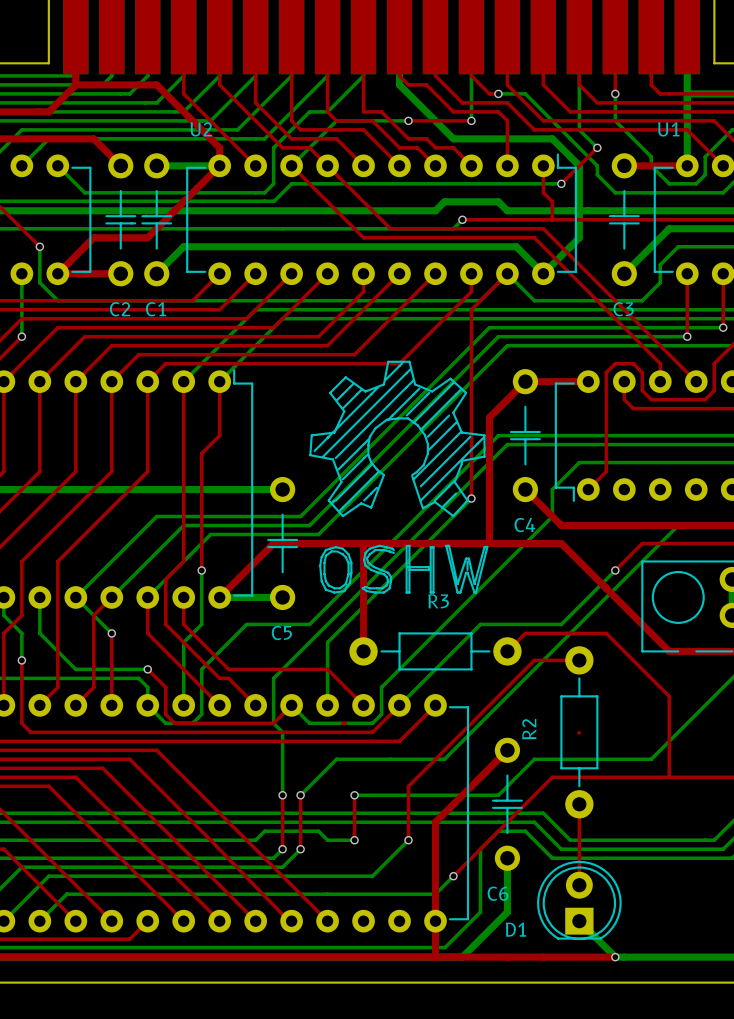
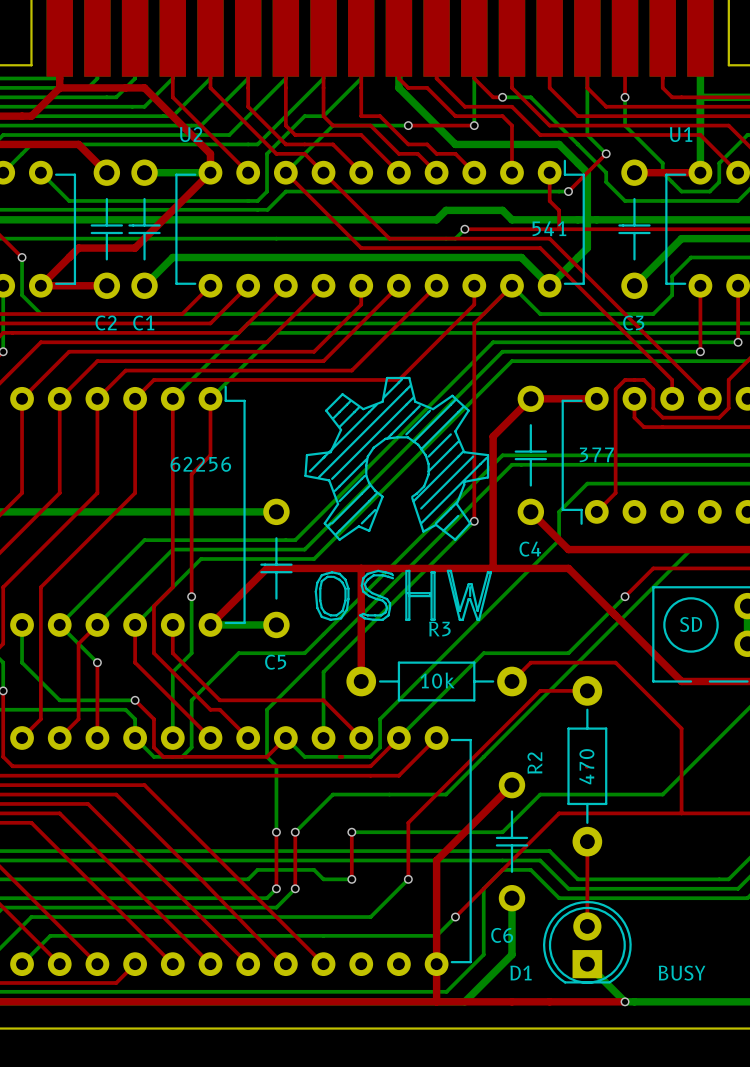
U2 value: none -> 541 (549, 228)
part value: none -> 377 (596, 454)
part value: none -> 62256 (200, 464)
part value: none -> SD (691, 624)
R3 value: none -> 10k (437, 680)
R2 value: none -> 470 (586, 766)
D1 value: none -> BUSY (682, 973)

